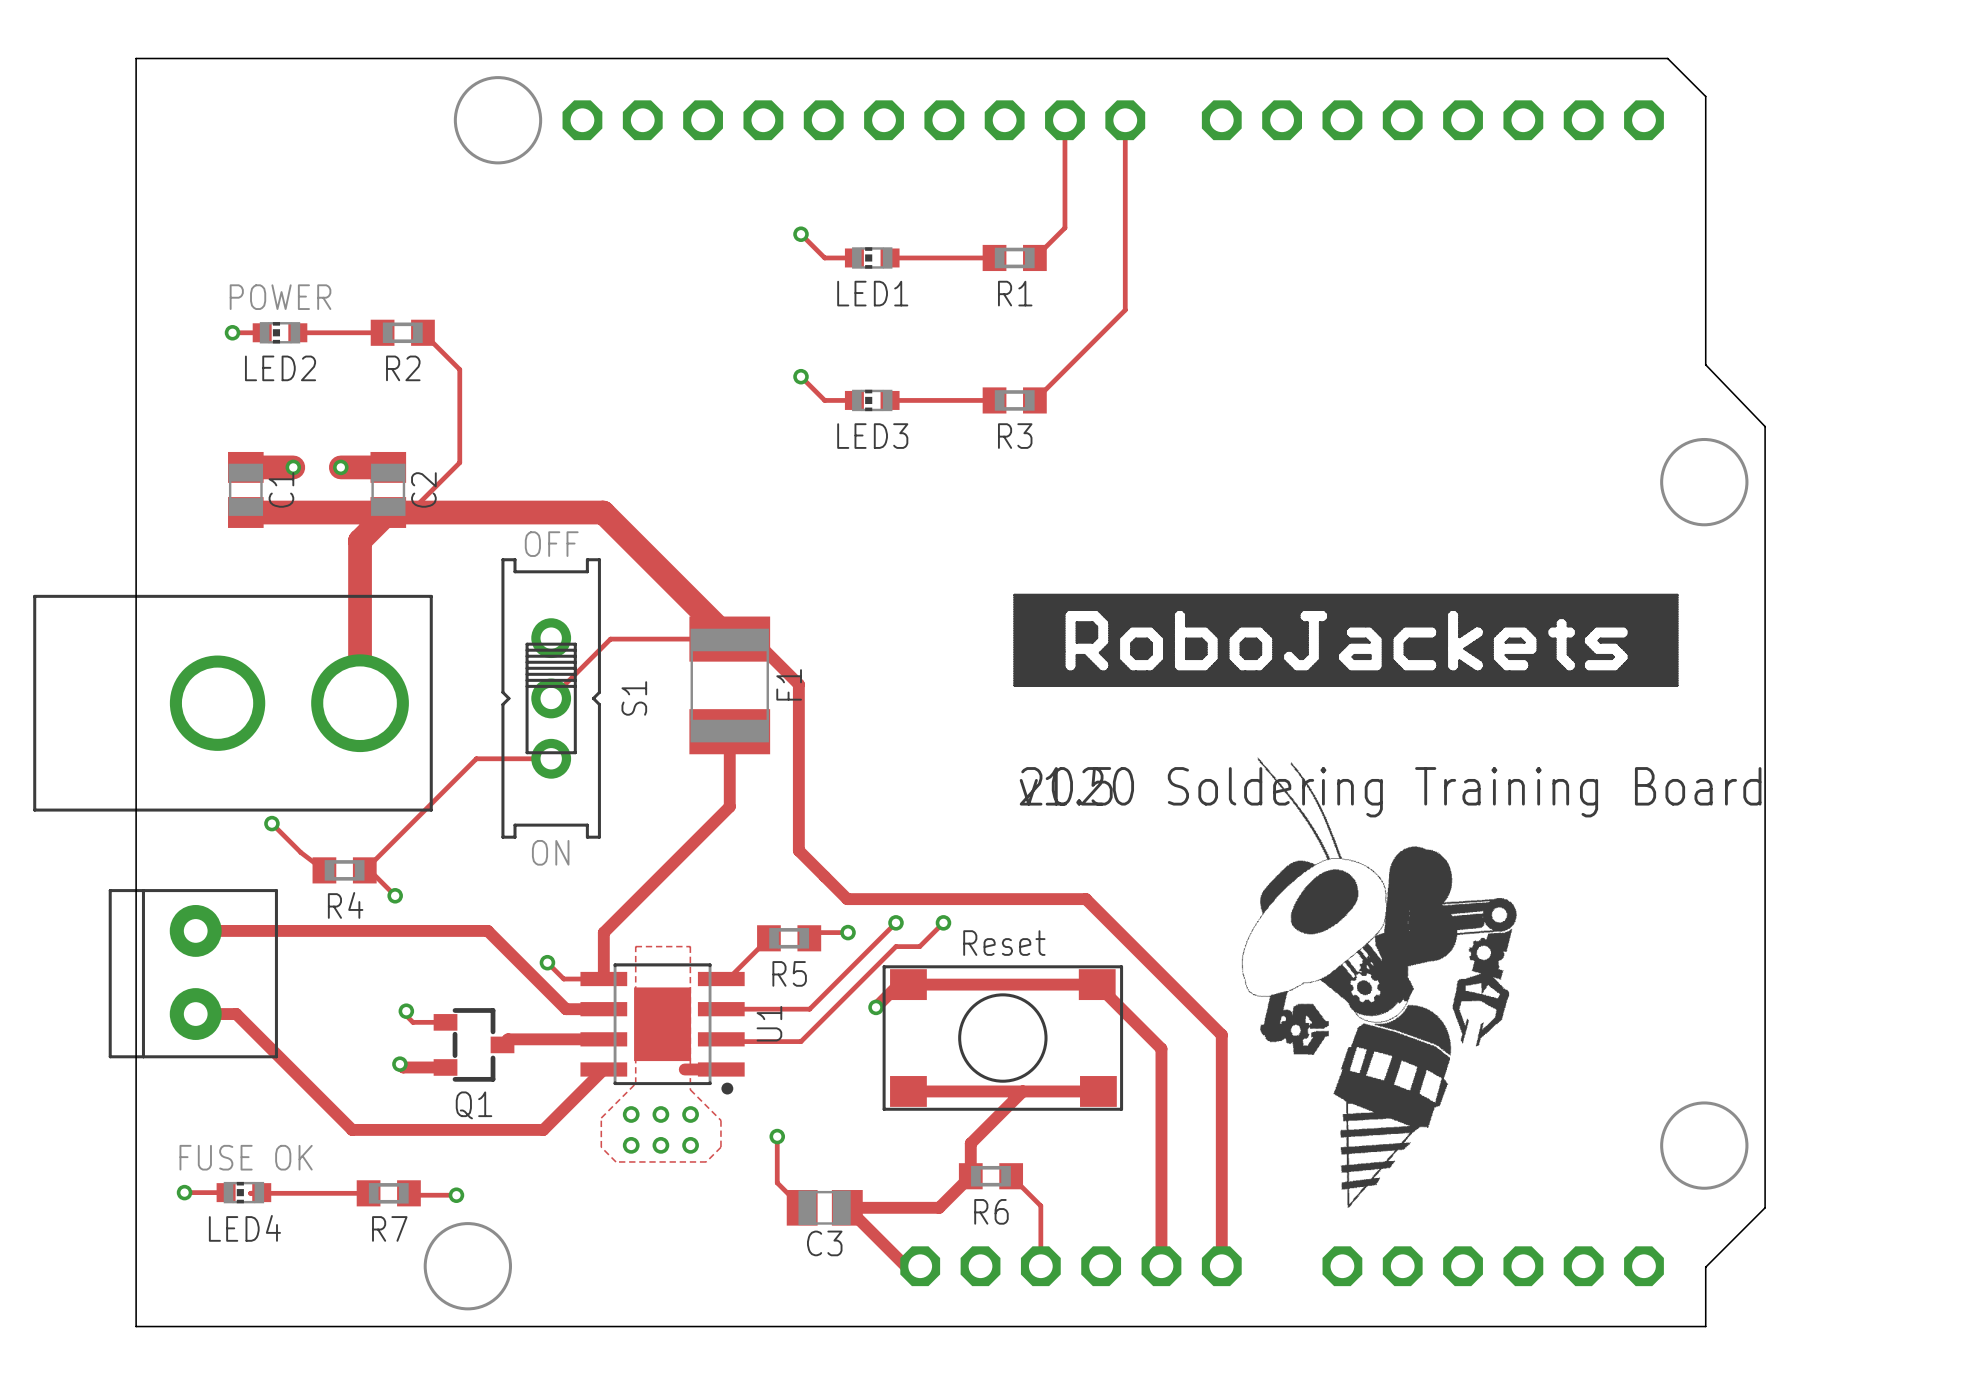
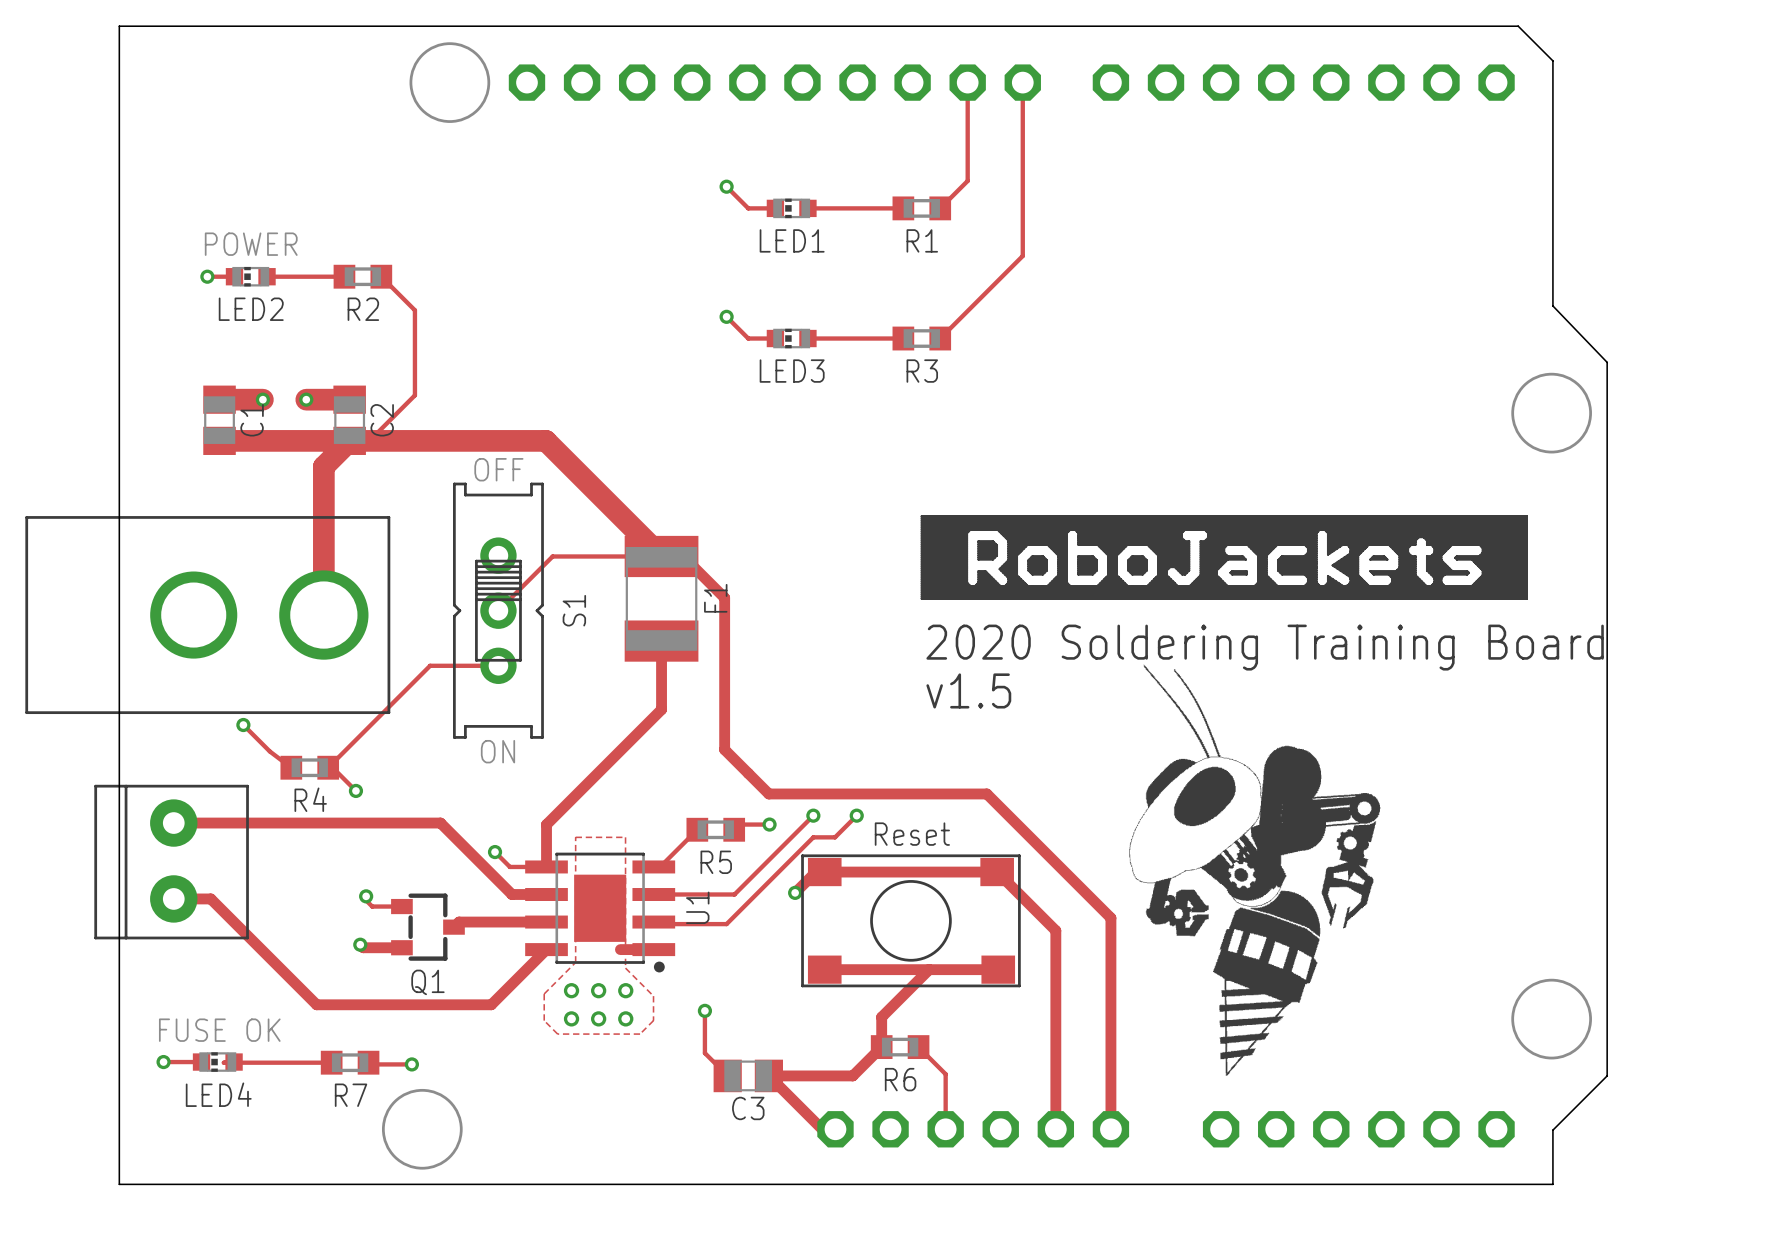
text position: 2020 Soldering Training Board (1390, 792) -> 2020 Soldering Training Board (1265, 647)

